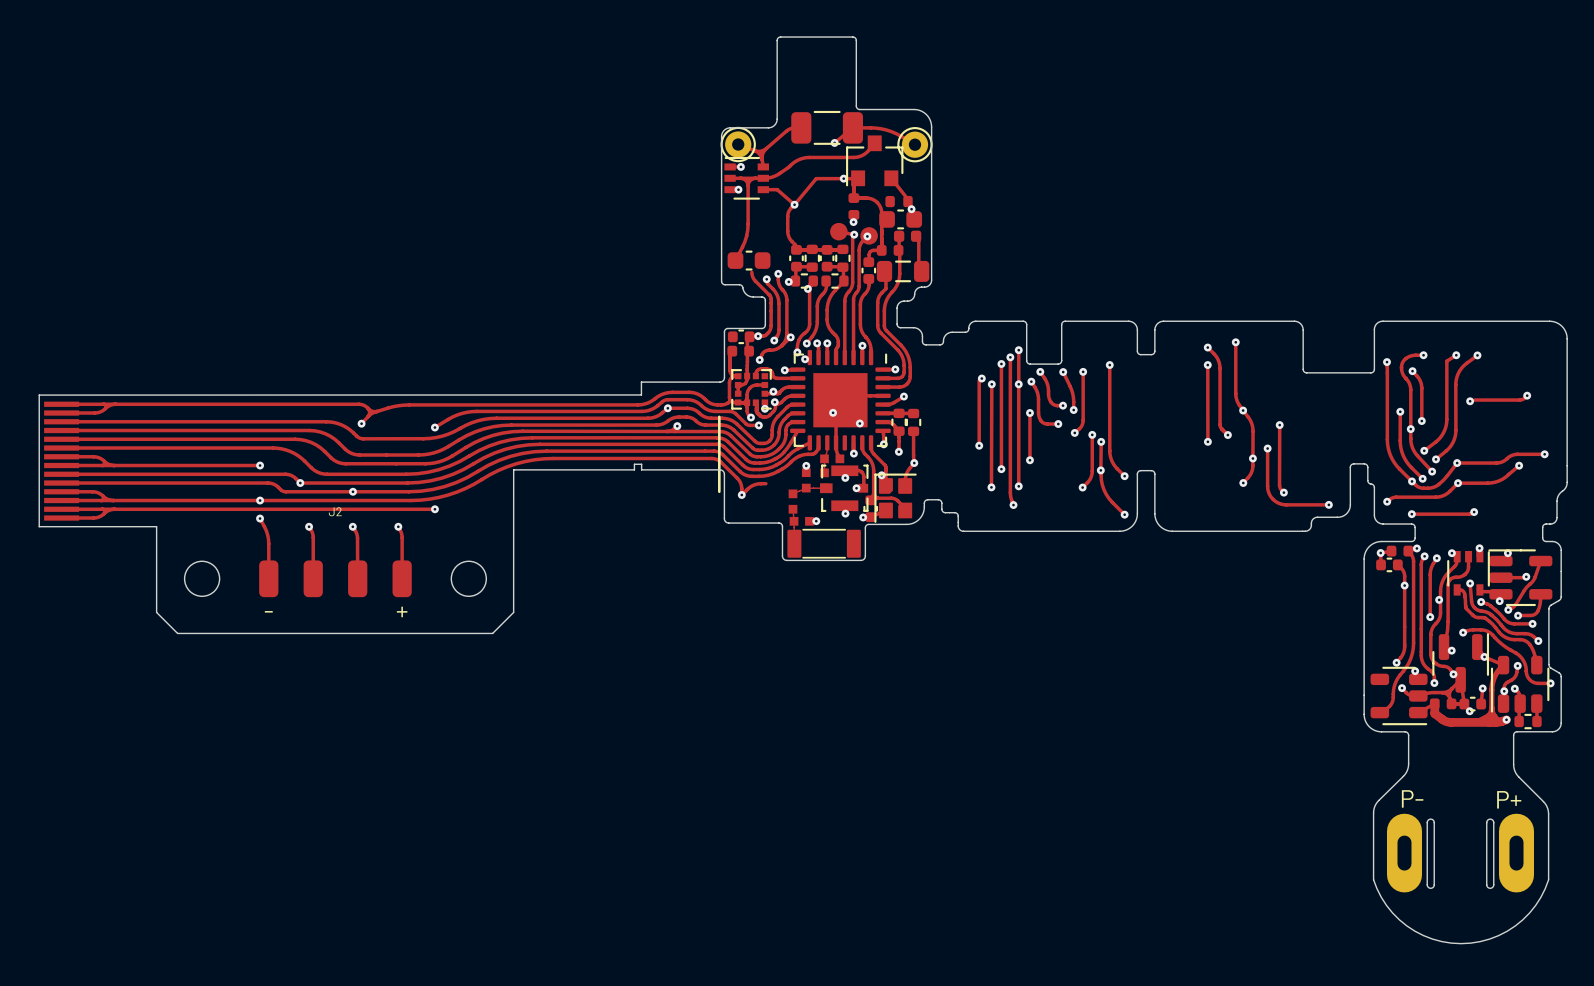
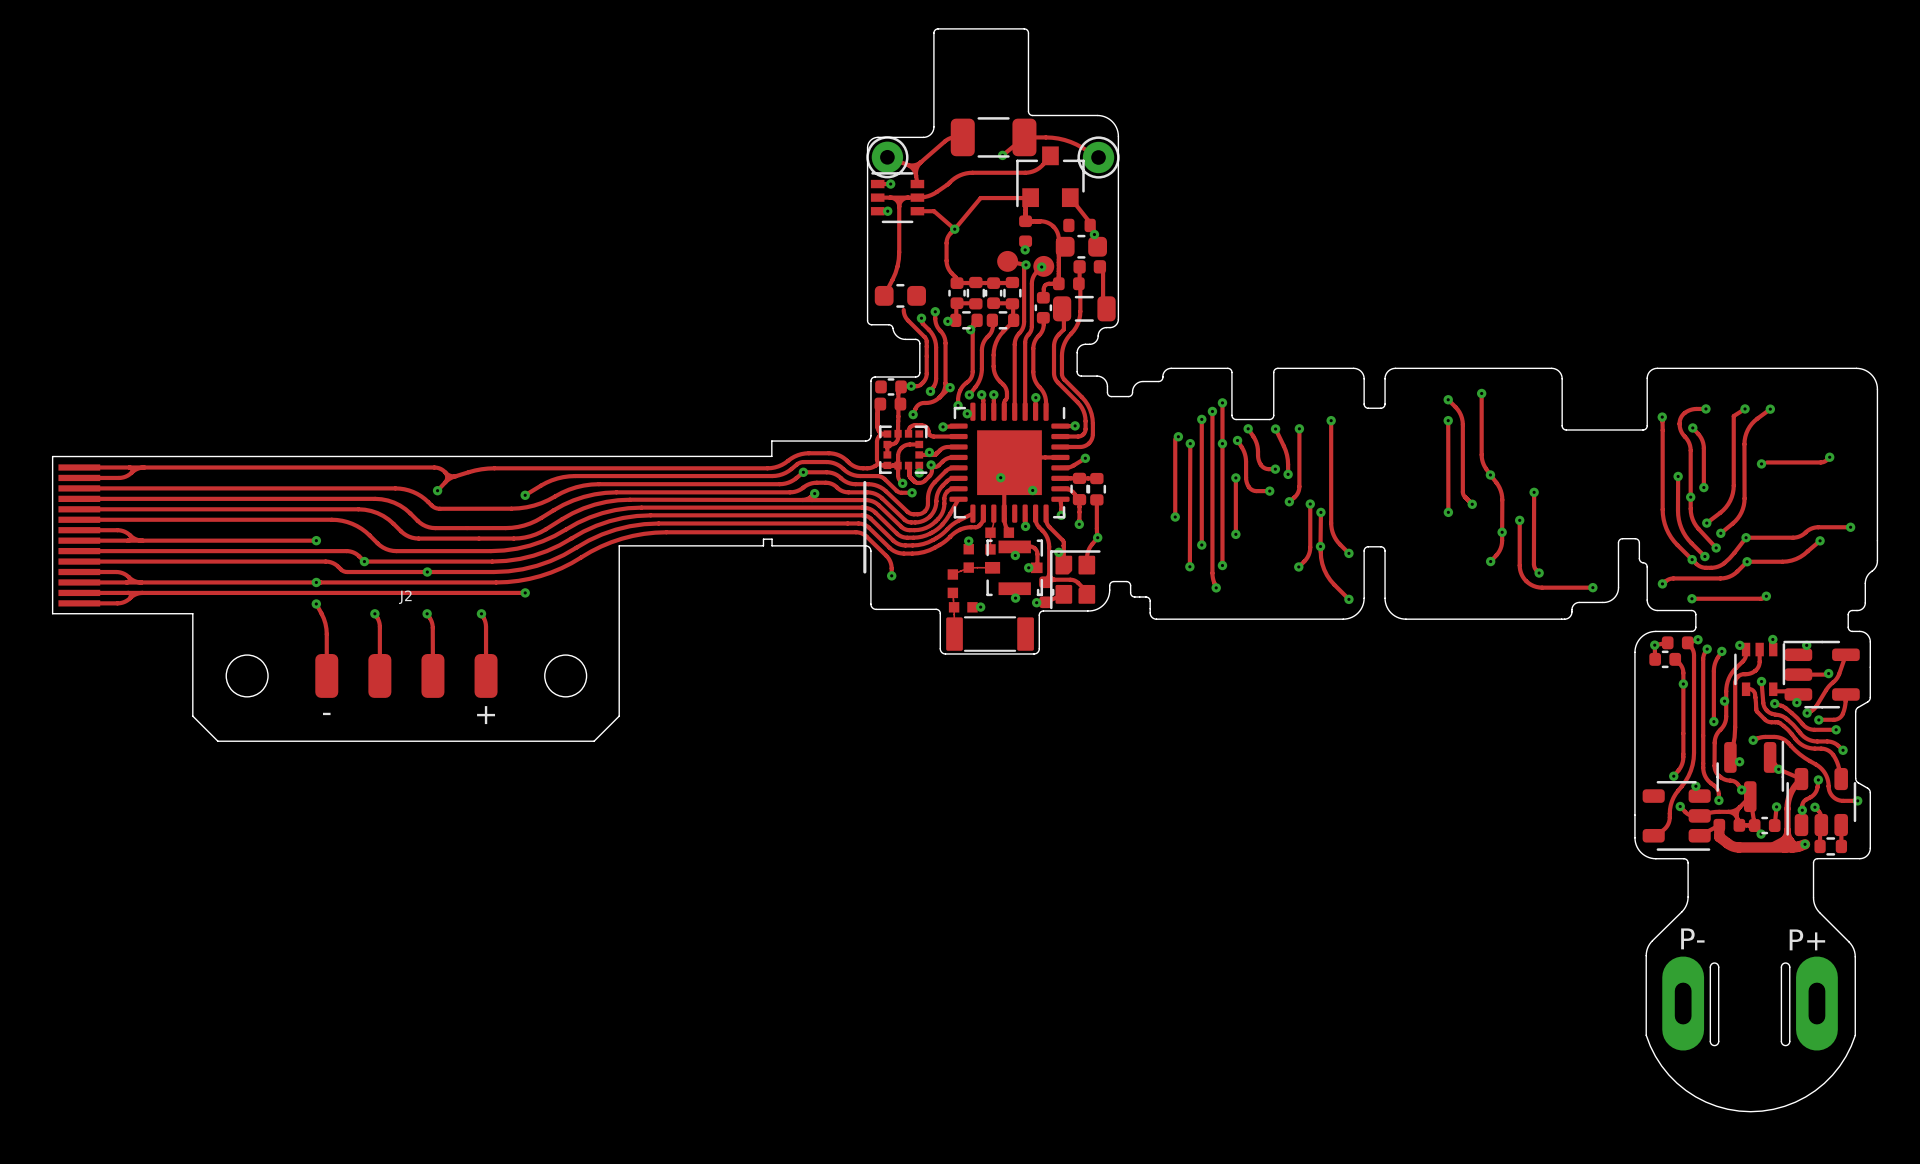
via: (843, 178) -> none
track: (765, 483) (753, 485) (741, 494) -> none

